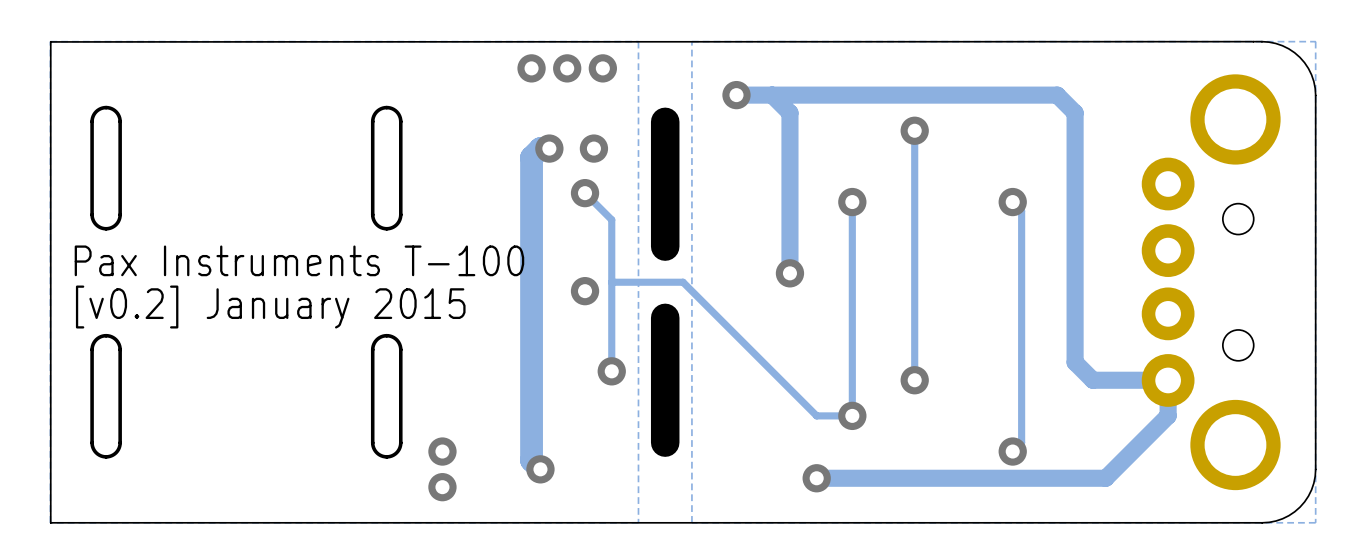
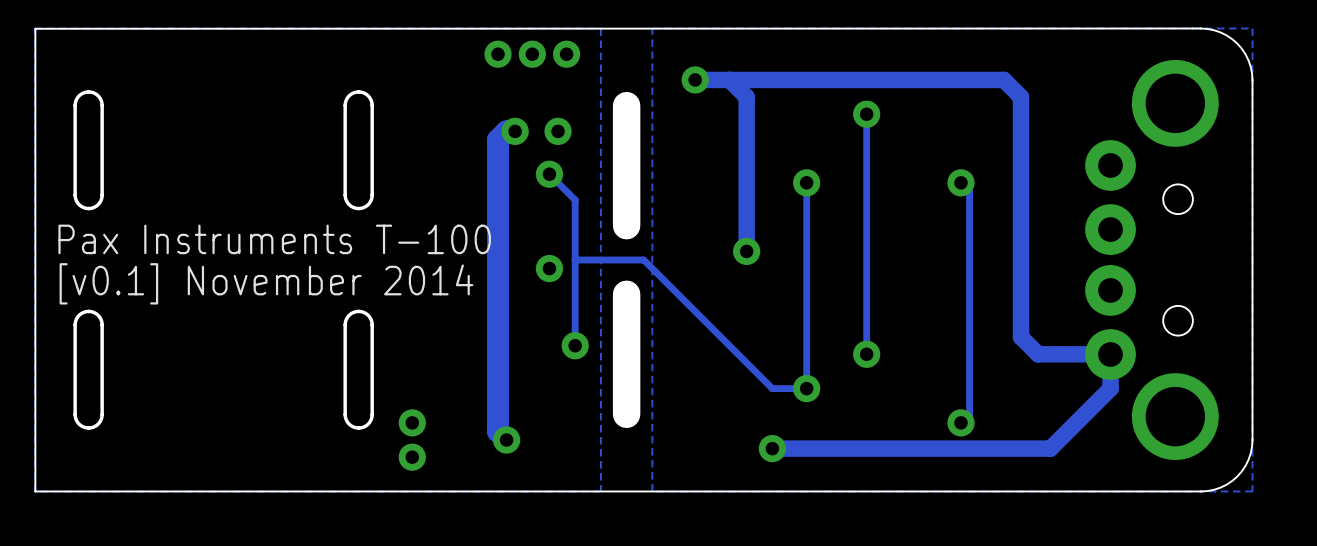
text: [v0.2] January 2015 (270, 307) -> [v0.1] November 2014 (266, 283)

